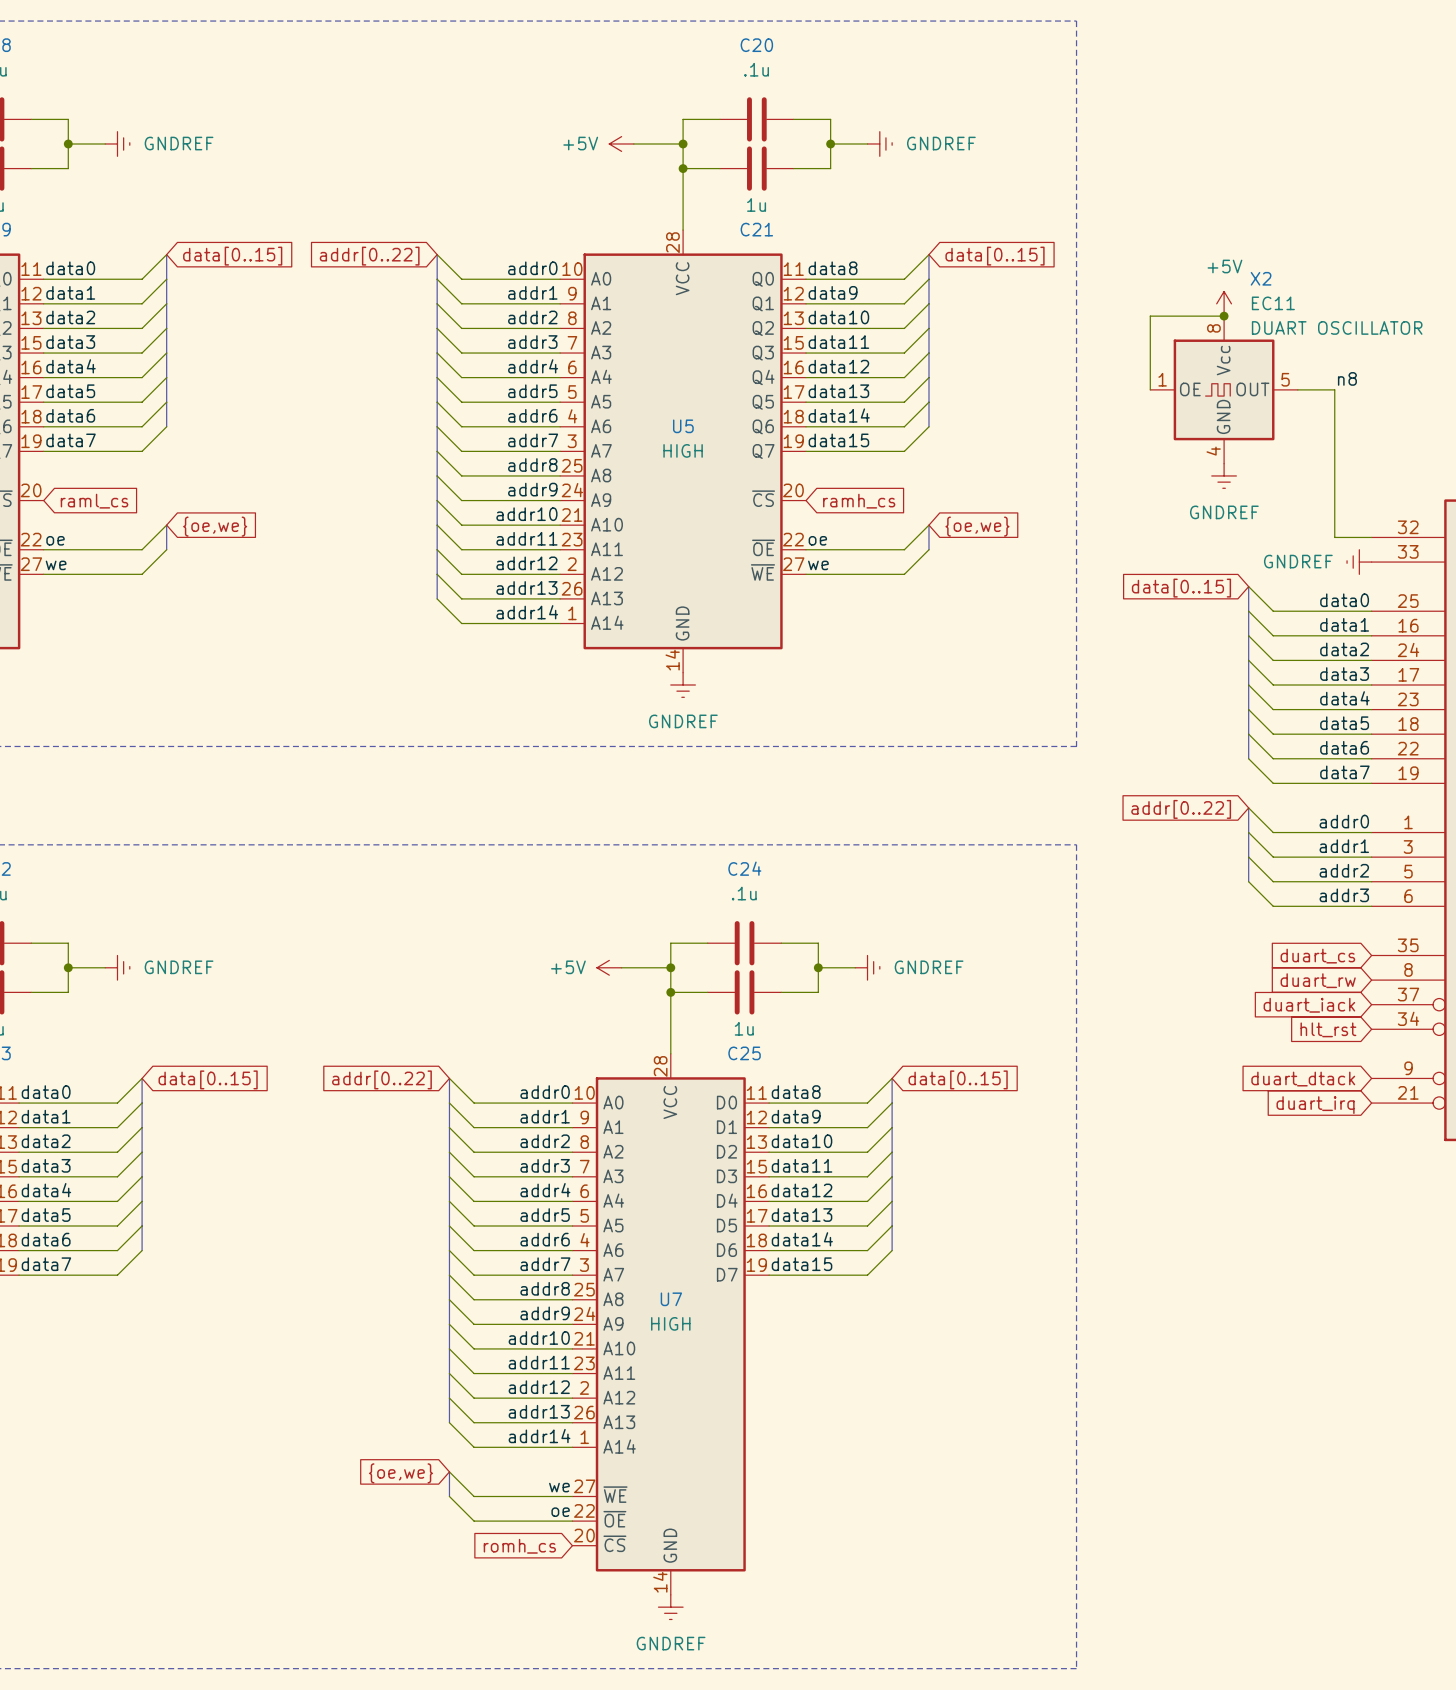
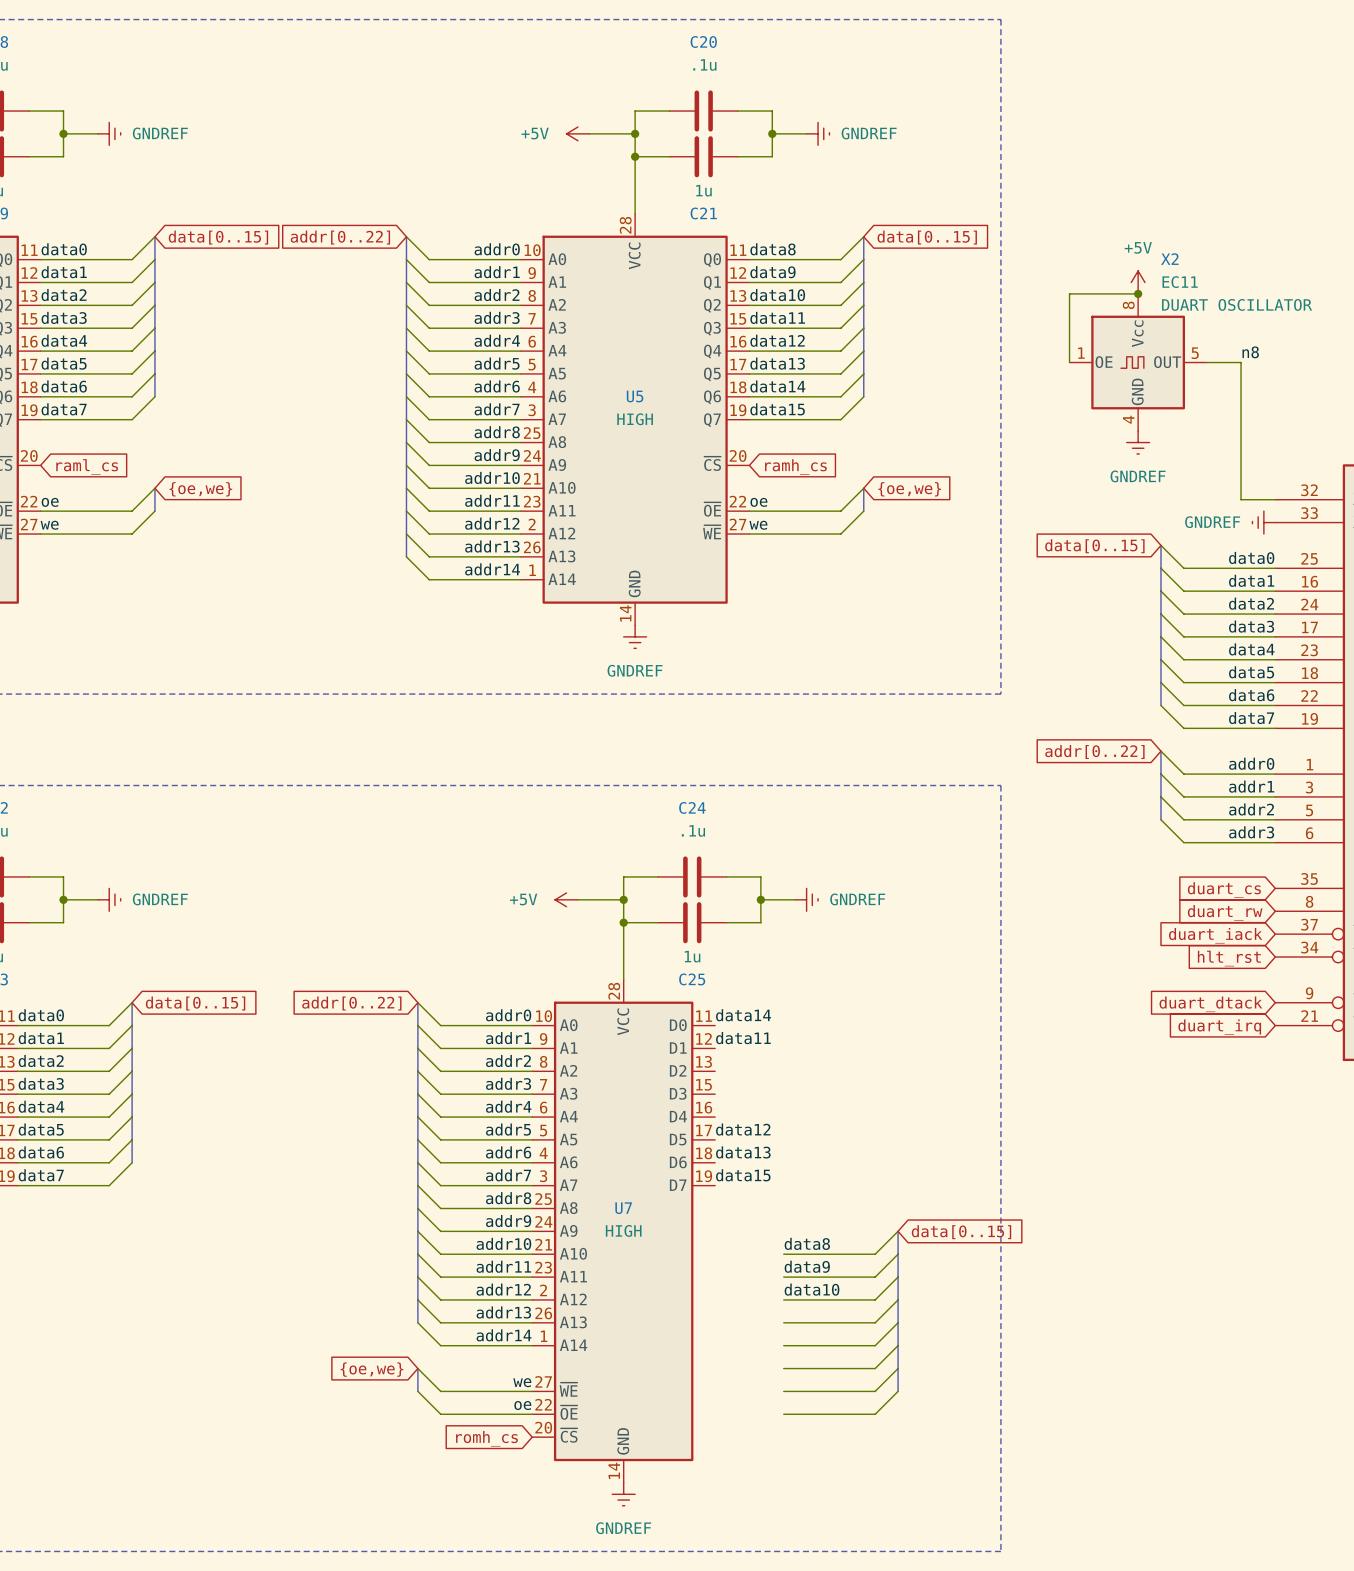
wire: (892, 1078) (867, 1103) (769, 1103) -> none
bus: (892, 1078) (892, 1250) -> none
global label: data[0..15] (958, 1079) -> none
label: data8 (796, 1092) -> data14 (743, 1015)
wire: (892, 1103) (867, 1127) (769, 1127) -> (898, 1231) (875, 1254) (783, 1254)
label: data9 (796, 1116) -> data11 (743, 1038)
wire: (892, 1127) (867, 1152) (769, 1152) -> (898, 1254) (875, 1277) (783, 1277)
label: data10 (802, 1141) -> none
wire: (892, 1152) (867, 1176) (769, 1176) -> (898, 1277) (875, 1299) (783, 1299)
label: data11 (802, 1165) -> none
wire: (892, 1176) (867, 1201) (769, 1201) -> (898, 1299) (875, 1322) (783, 1322)
label: data12 (802, 1190) -> none
wire: (892, 1201) (867, 1226) (769, 1226) -> (898, 1322) (875, 1345) (783, 1345)
label: data13 (802, 1215) -> data12 (743, 1129)
wire: (892, 1226) (867, 1250) (769, 1250) -> (898, 1345) (875, 1368) (783, 1368)
label: data14 (802, 1239) -> data13 (743, 1152)
wire: (892, 1250) (867, 1275) (769, 1275) -> (898, 1368) (875, 1391) (783, 1391)
bus: none -> (898, 1231) (898, 1391)
global label: none -> data[0..15] (961, 1232)
label: none -> data8 (807, 1243)
label: none -> data9 (807, 1266)
label: none -> data10 (812, 1289)
wire: none -> (898, 1391) (875, 1414) (783, 1414)

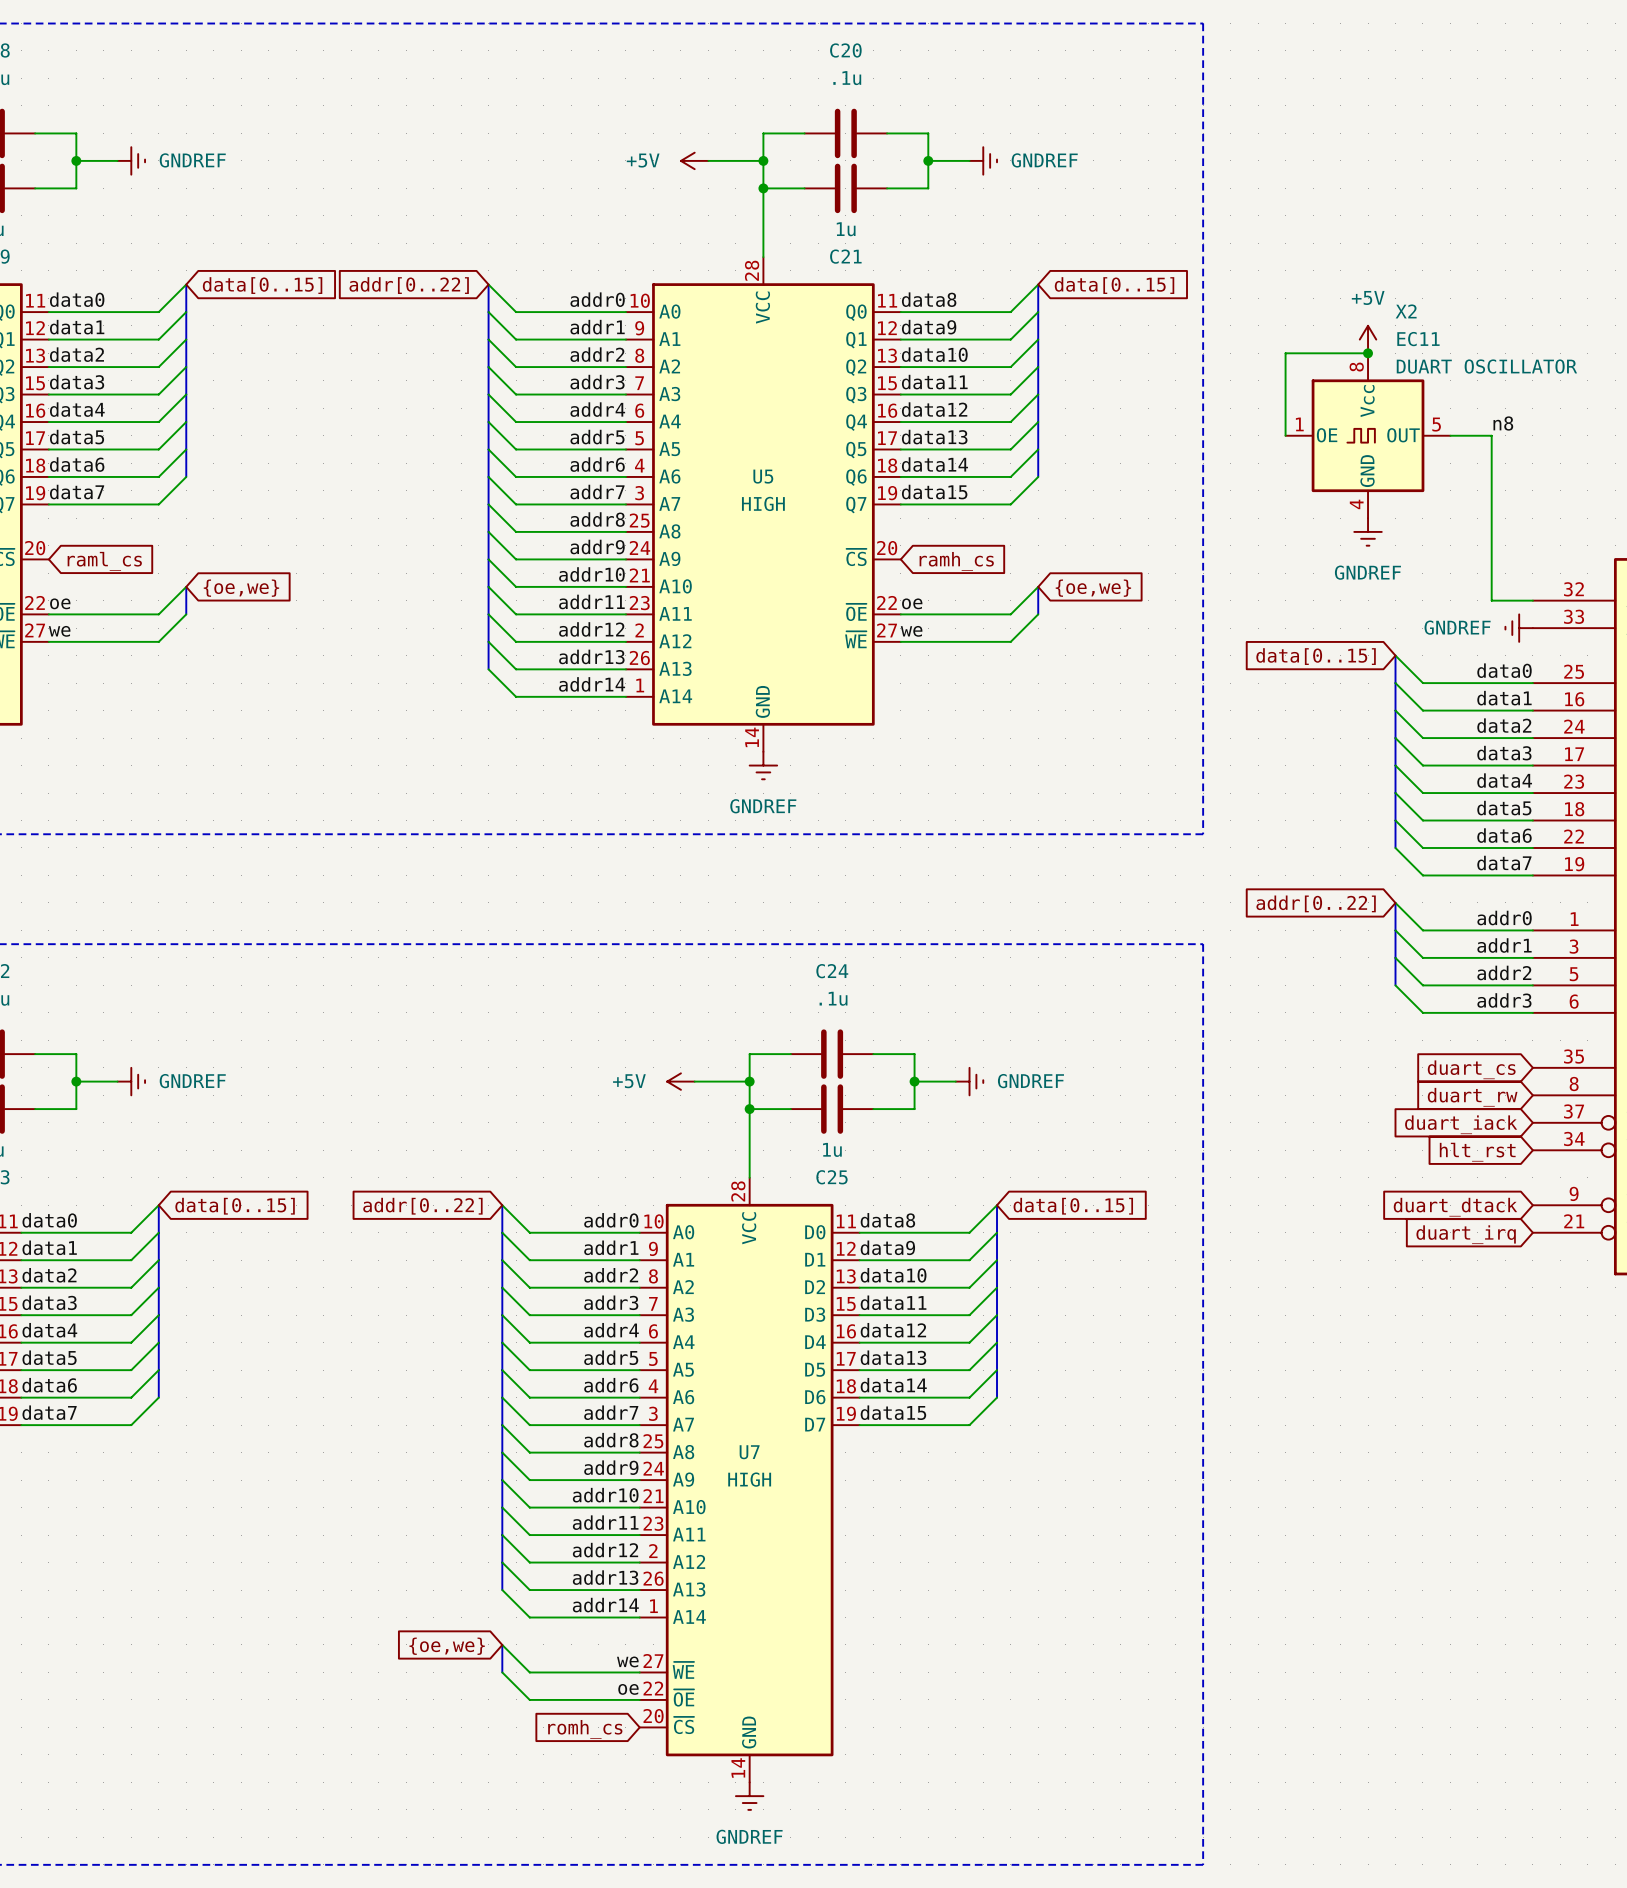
wire: none -> (997, 1205) (969, 1232) (859, 1232)
bus: none -> (997, 1205) (997, 1397)
global label: none -> data[0..15] (1073, 1206)
label: data14 (743, 1015) -> data8 (887, 1220)
label: data11 (743, 1038) -> data9 (887, 1247)
label: none -> data10 (893, 1275)
label: none -> data11 (893, 1302)
label: none -> data12 (893, 1330)
label: data12 (743, 1129) -> data13 (893, 1357)
label: data13 (743, 1152) -> data14 (893, 1385)
wire: (898, 1231) (875, 1254) (783, 1254) -> (997, 1232) (969, 1260) (859, 1260)
bus: (898, 1231) (898, 1391) -> none
global label: data[0..15] (961, 1232) -> none
label: data8 (807, 1243) -> none
wire: (898, 1254) (875, 1277) (783, 1277) -> (997, 1260) (969, 1287) (859, 1287)
label: data9 (807, 1266) -> none
wire: (898, 1277) (875, 1299) (783, 1299) -> (997, 1287) (969, 1315) (859, 1315)
label: data10 (812, 1289) -> none
wire: (898, 1299) (875, 1322) (783, 1322) -> (997, 1315) (969, 1342) (859, 1342)
wire: (898, 1322) (875, 1345) (783, 1345) -> (997, 1342) (969, 1370) (859, 1370)
wire: (898, 1345) (875, 1368) (783, 1368) -> (997, 1370) (969, 1397) (859, 1397)
wire: (898, 1368) (875, 1391) (783, 1391) -> (997, 1397) (969, 1425) (859, 1425)
wire: (898, 1391) (875, 1414) (783, 1414) -> none

